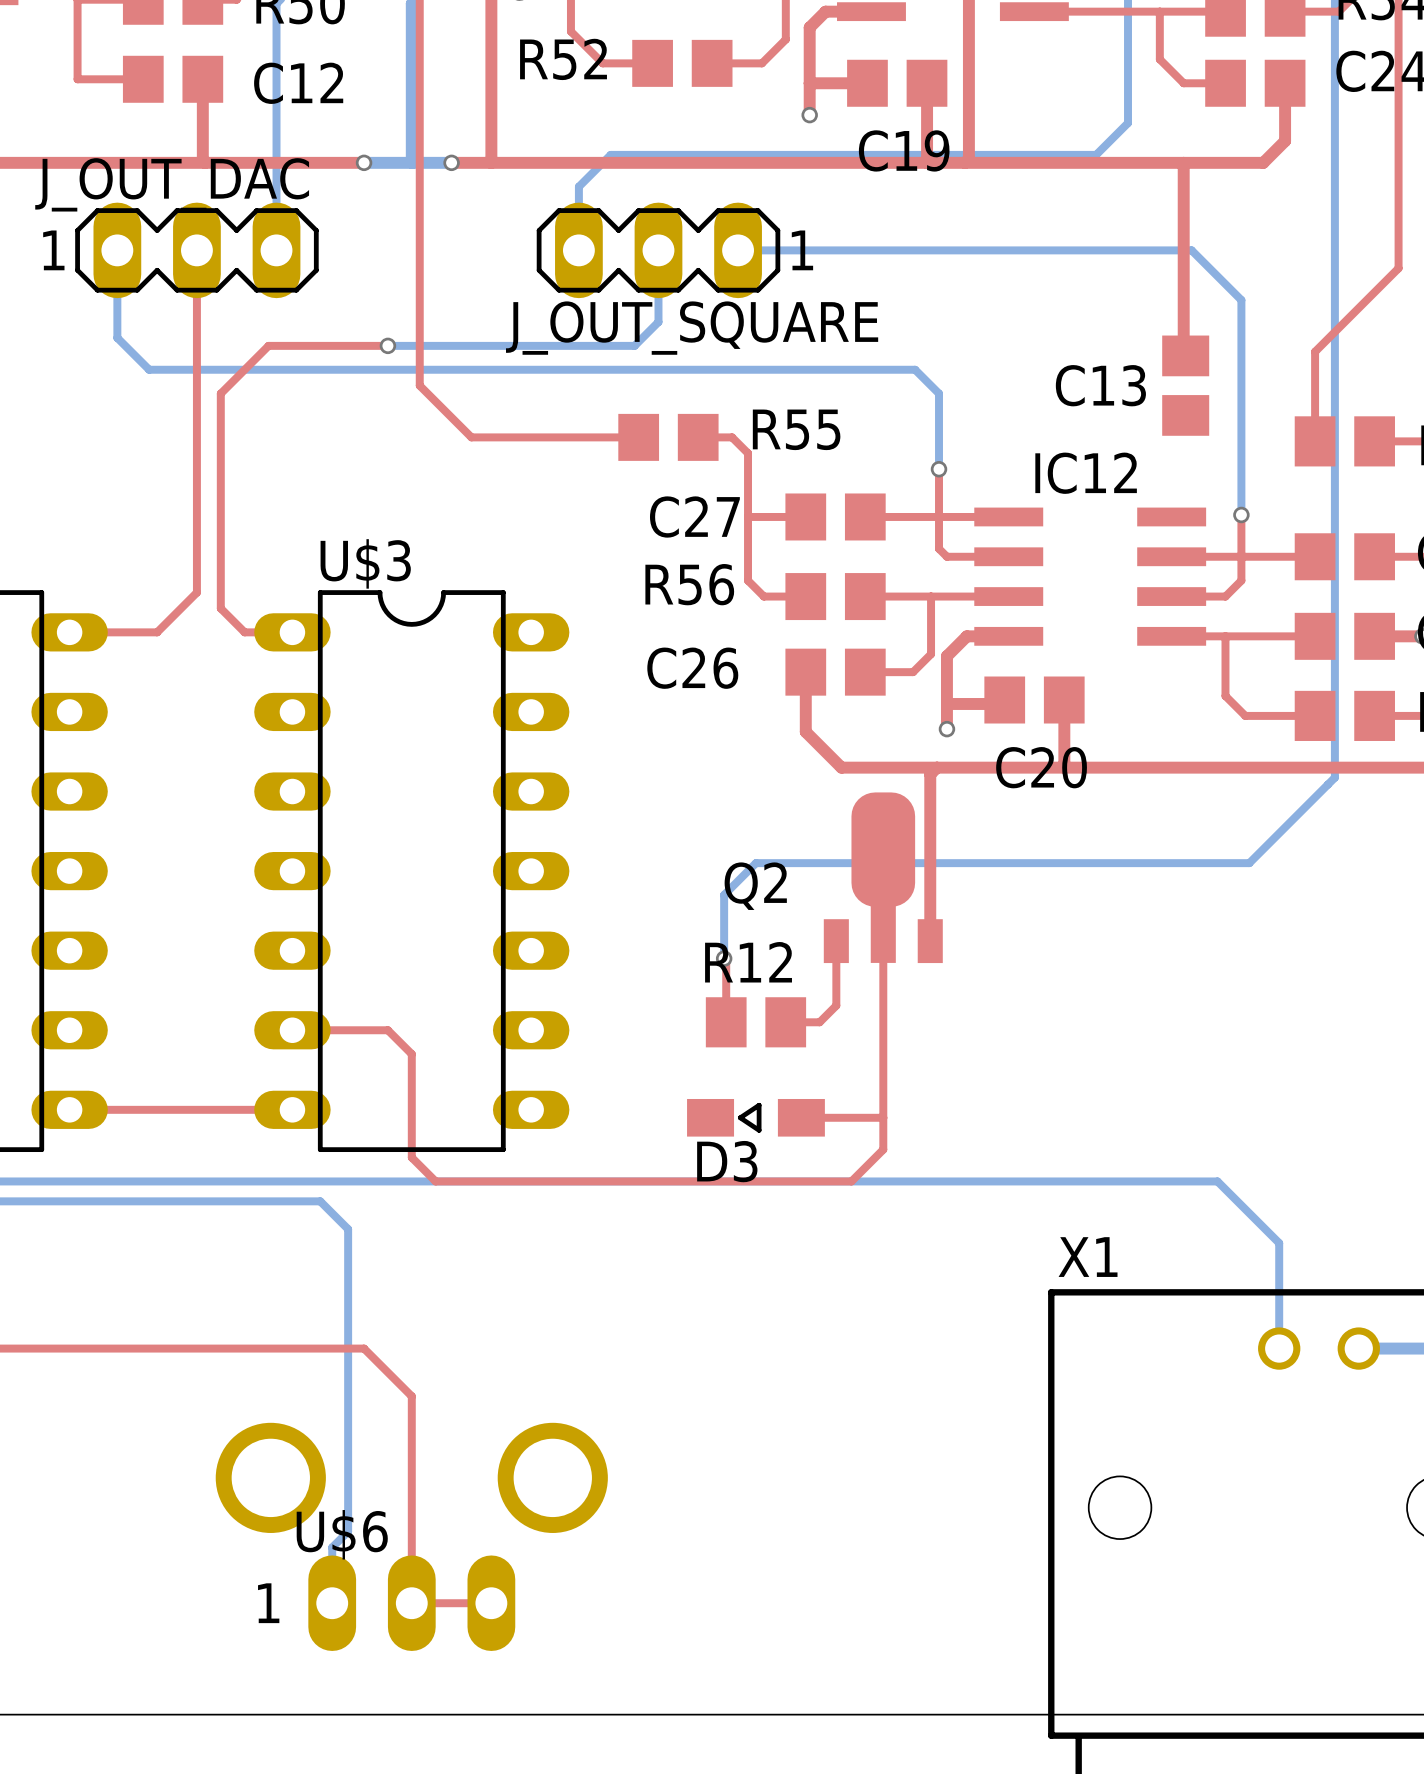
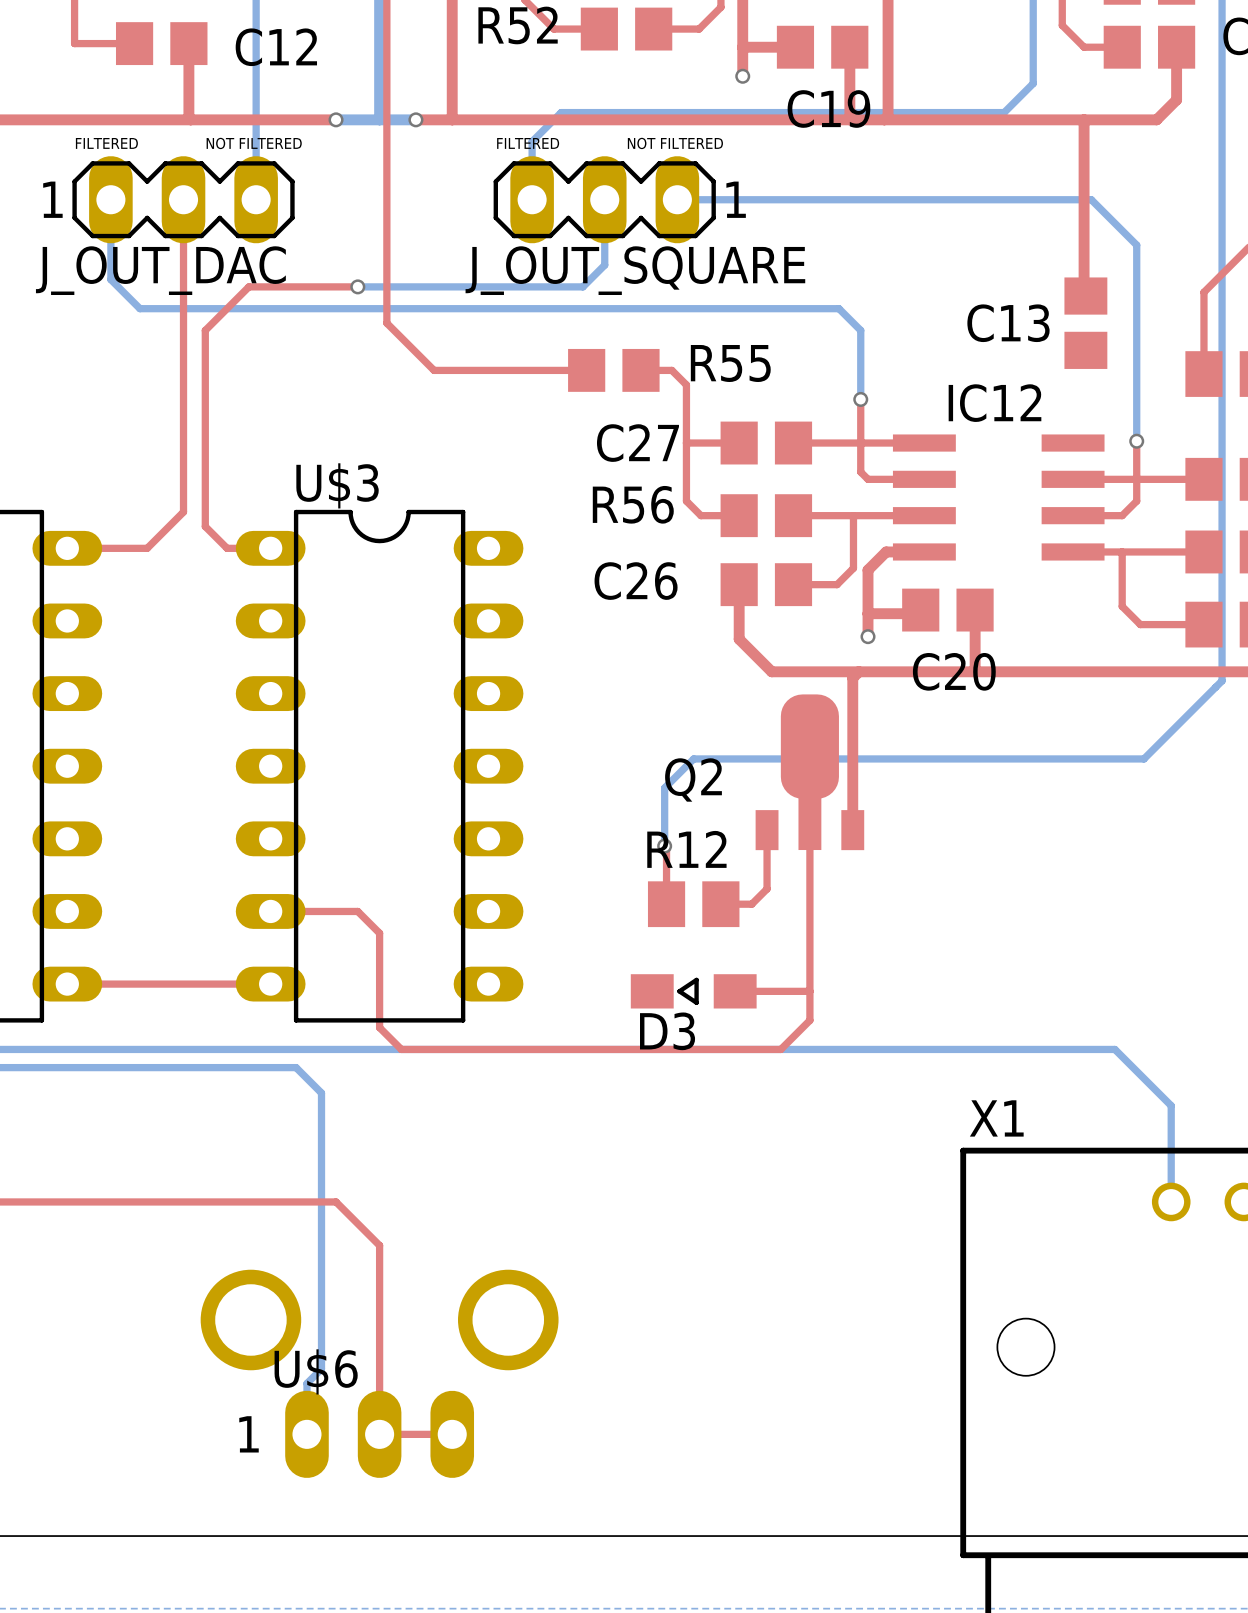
J_OUT_DAC name position: J_OUT_DAC (172, 184) -> J_OUT_DAC (160, 270)
text: none -> FILTERED (106, 143)
text: none -> NOT FILTERED (254, 143)
text: none -> FILTERED (528, 143)
text: none -> NOT FILTERED (675, 143)

